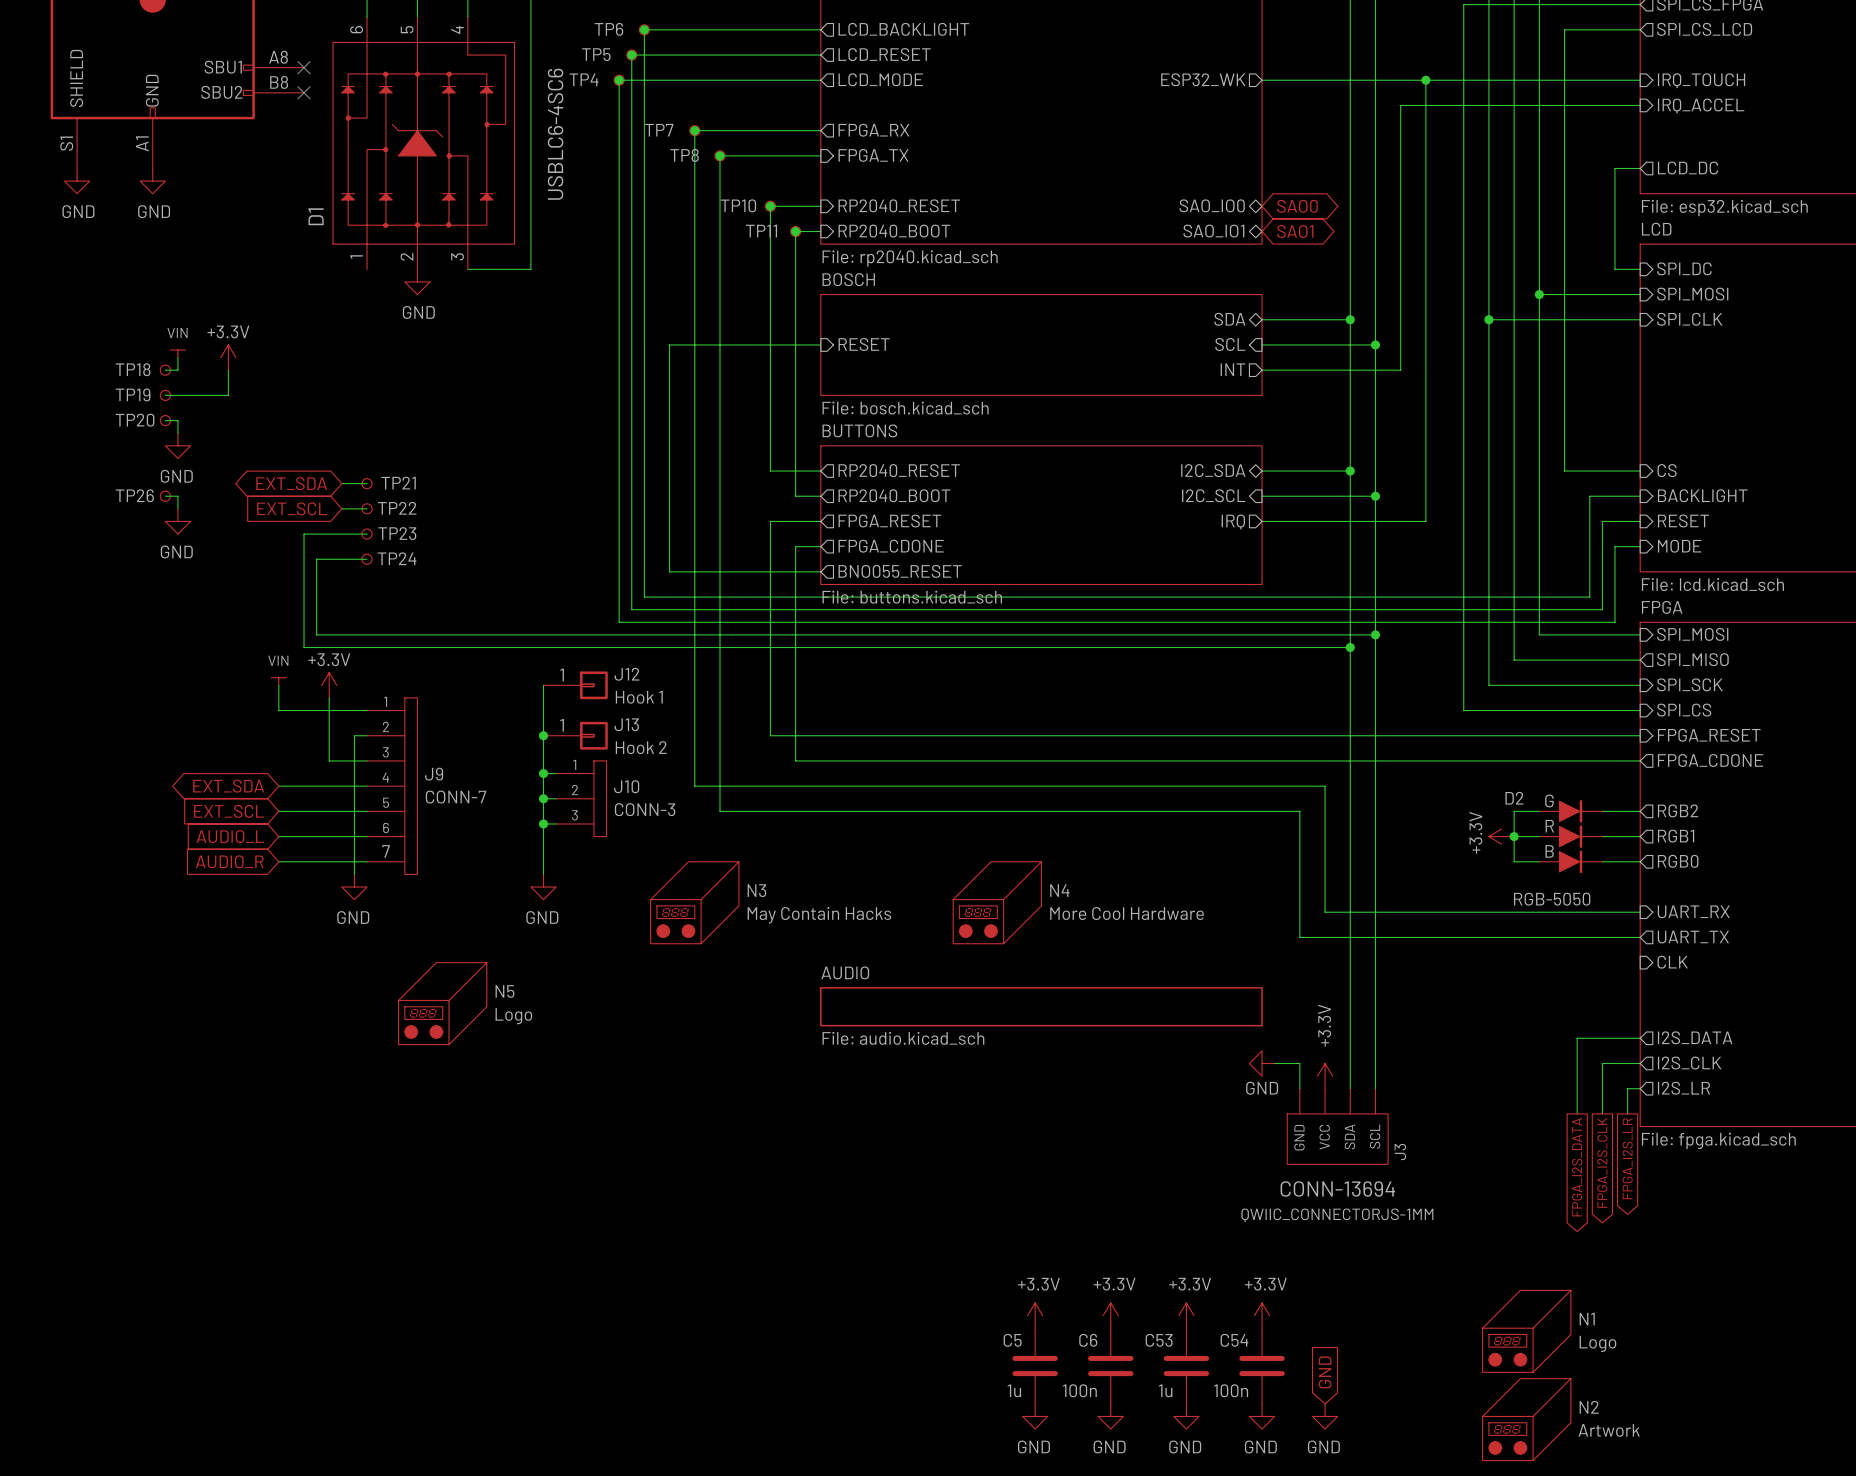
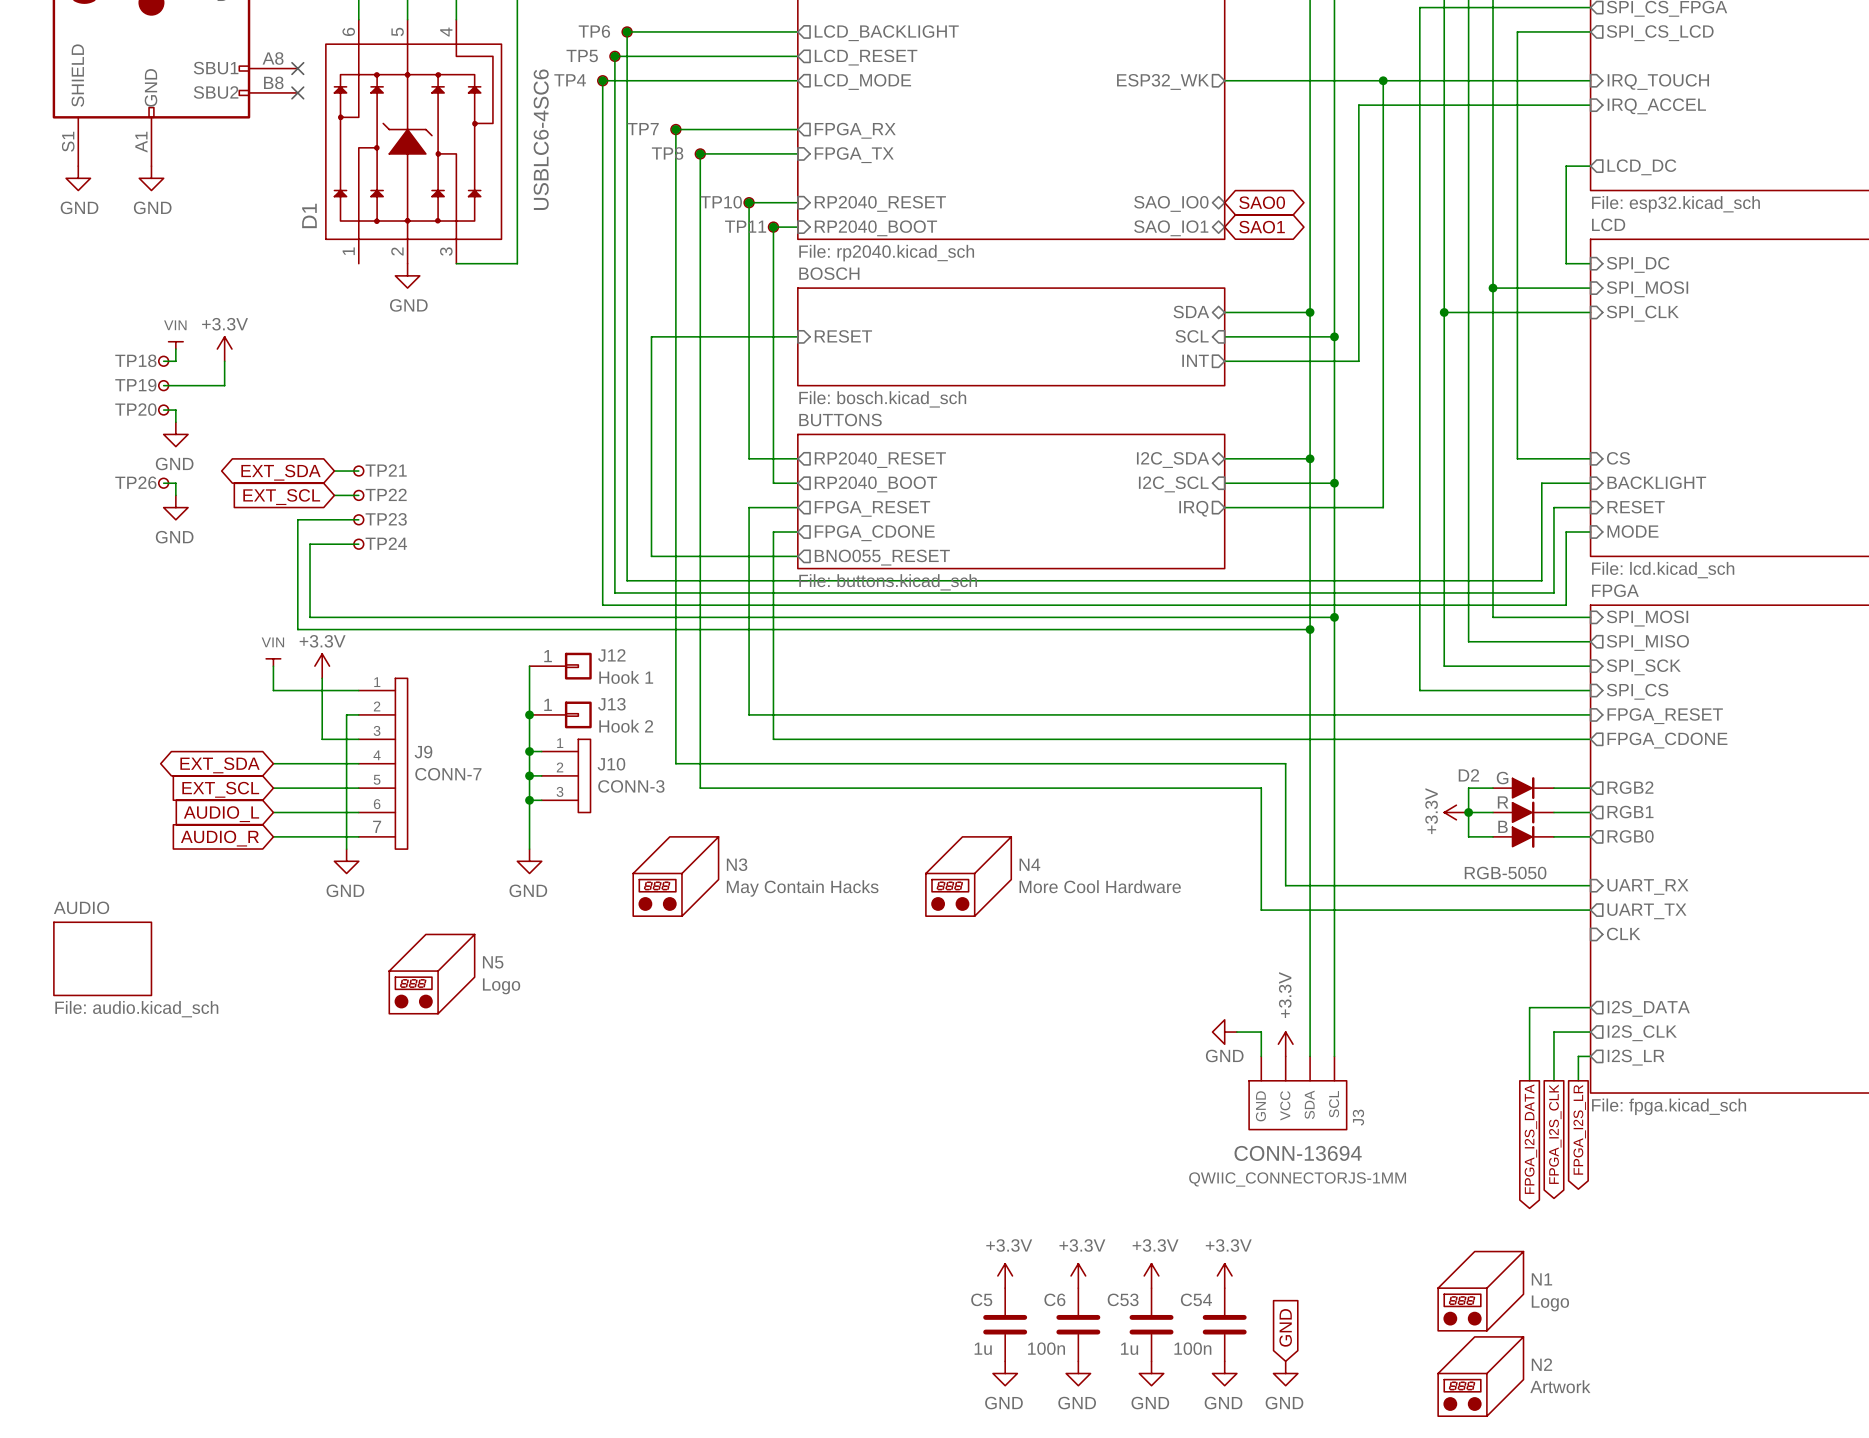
sheet AUDIO: none -> File: audio.kicad_sch (102, 958)
sheet AUDIO: File: audio.kicad_sch (1041, 1006) -> none

